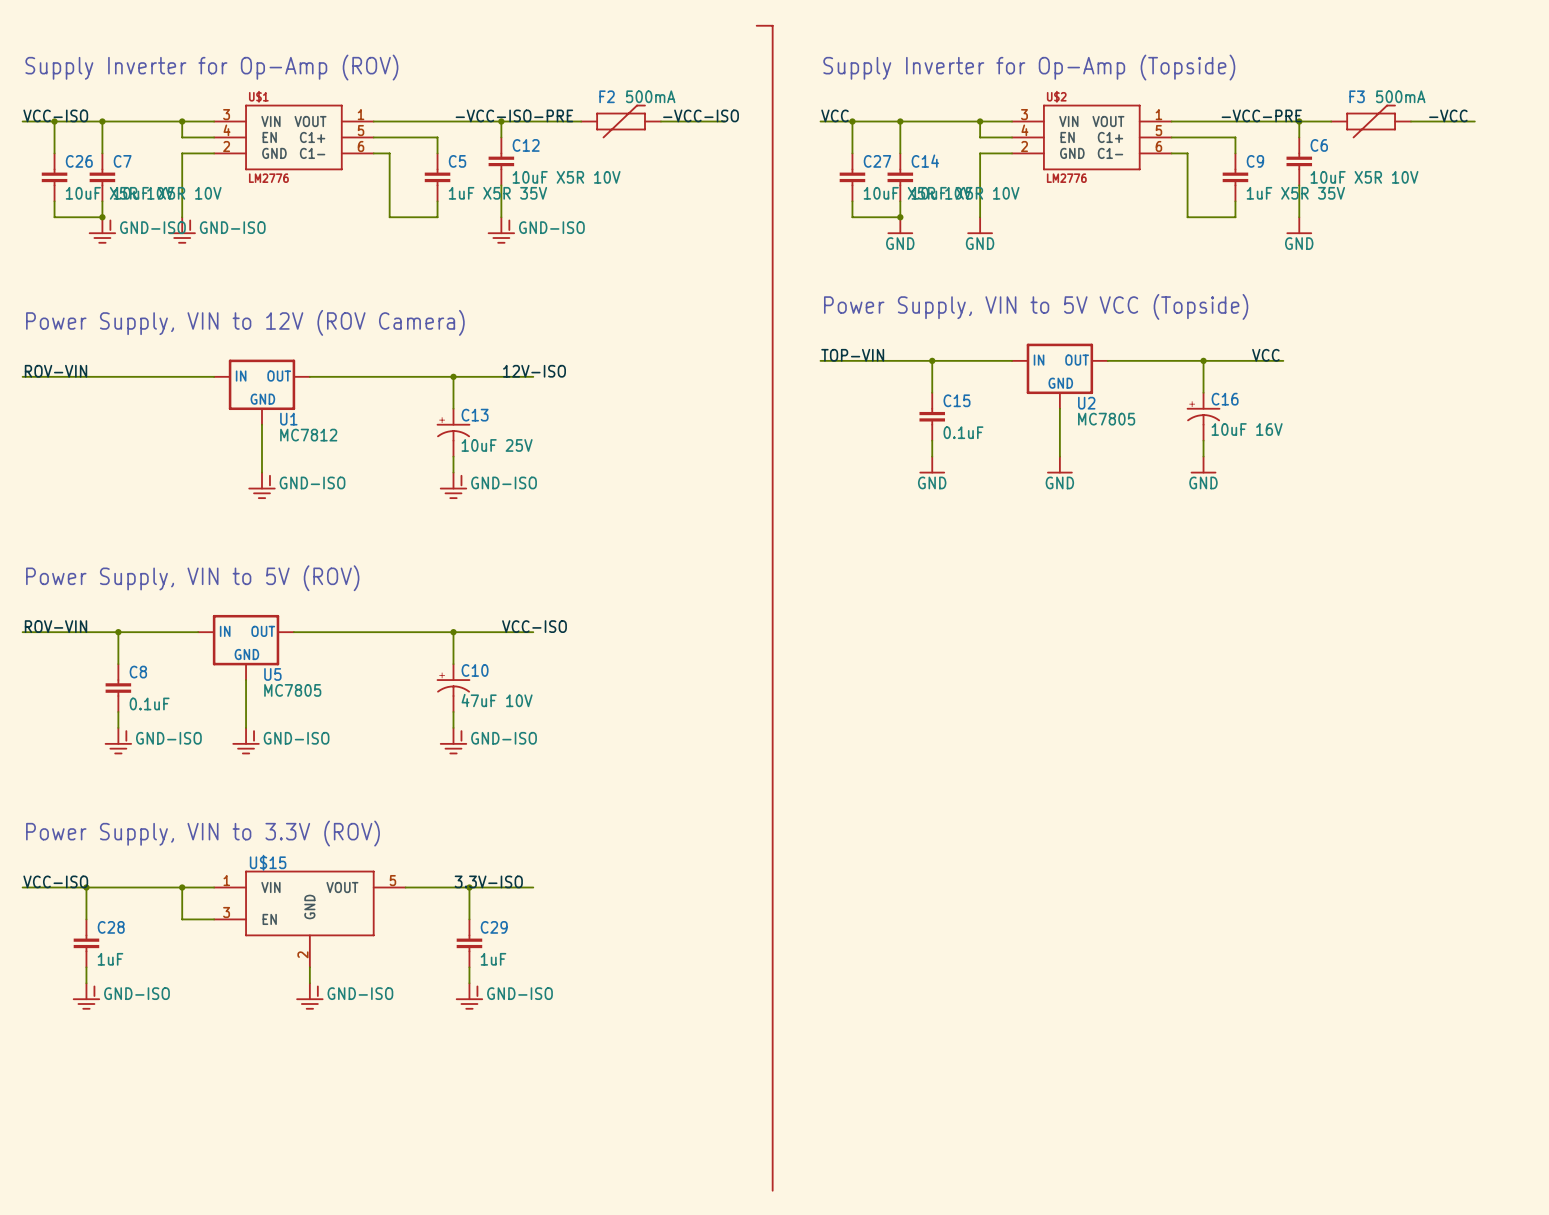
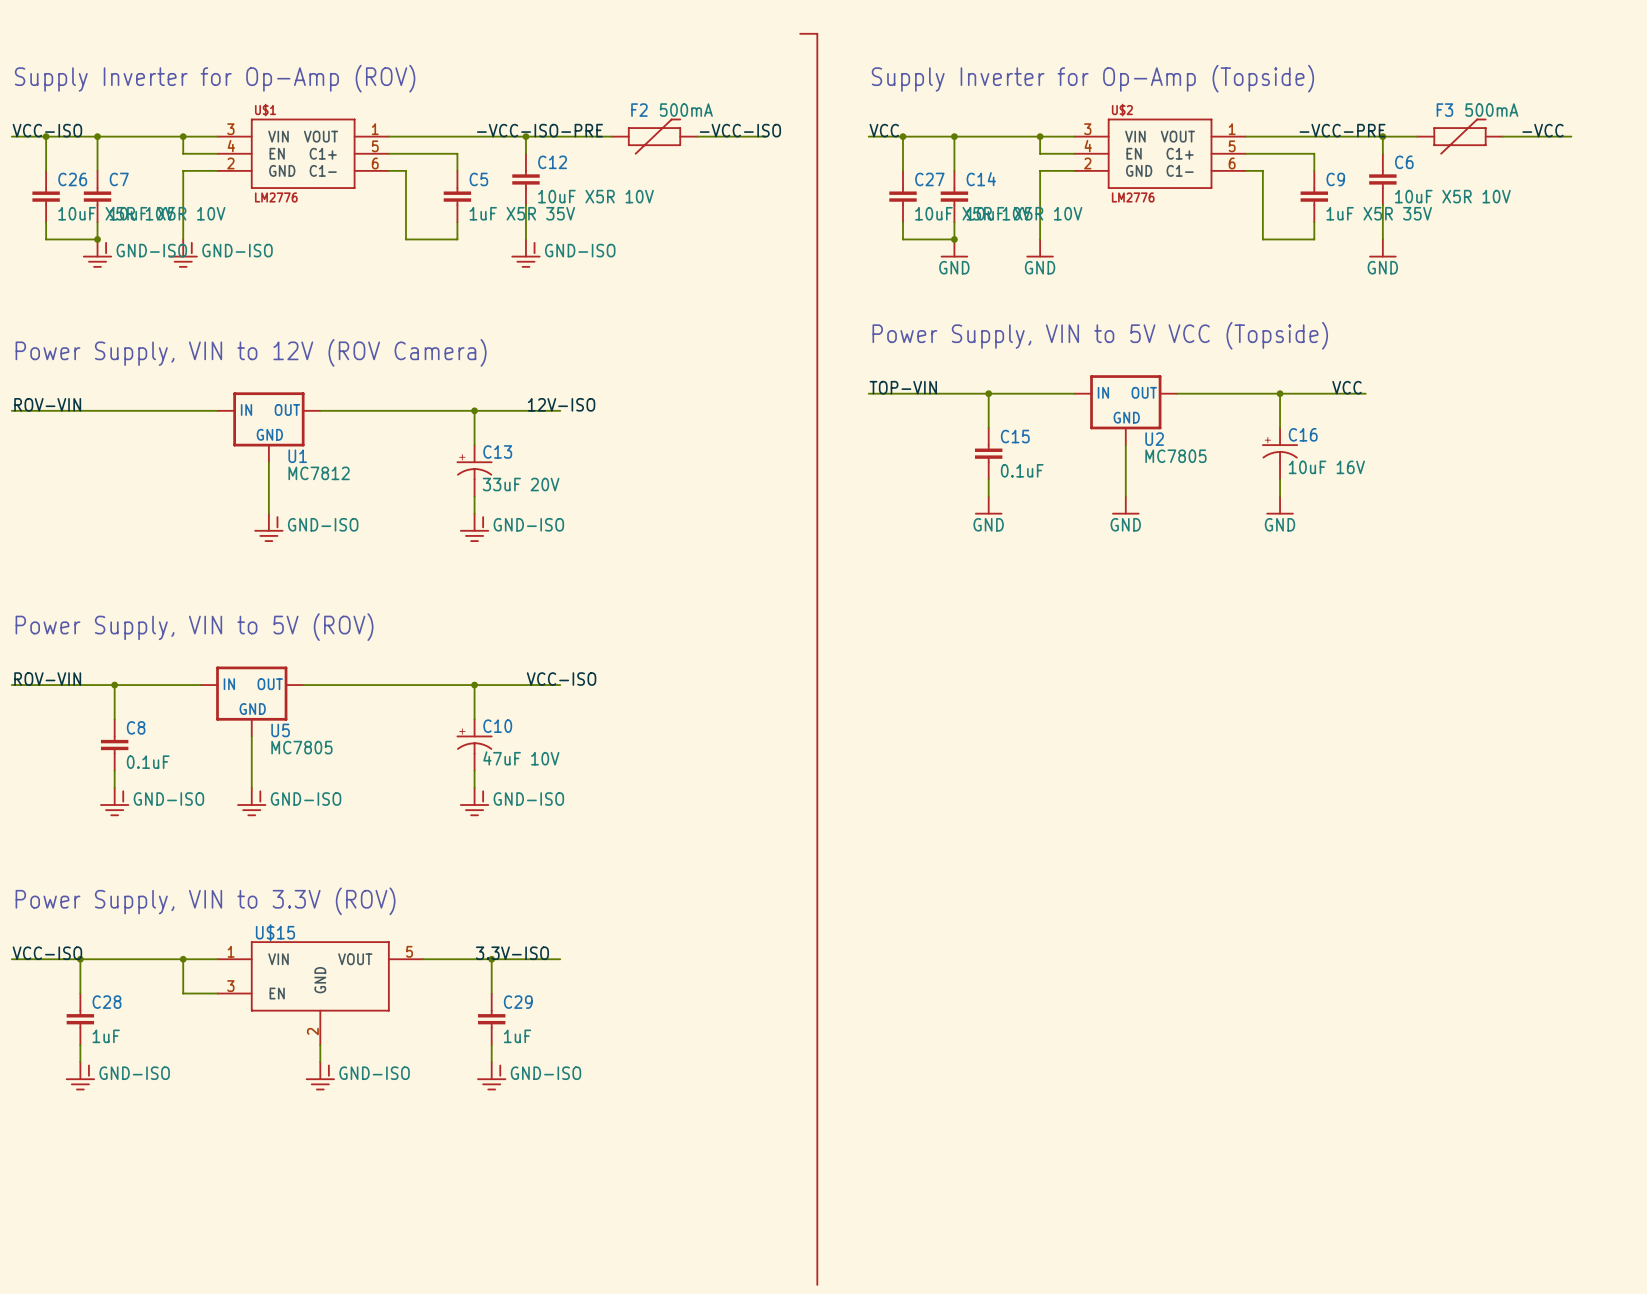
C13 value: 10uF 25V (497, 445) -> 33uF 20V (521, 484)

